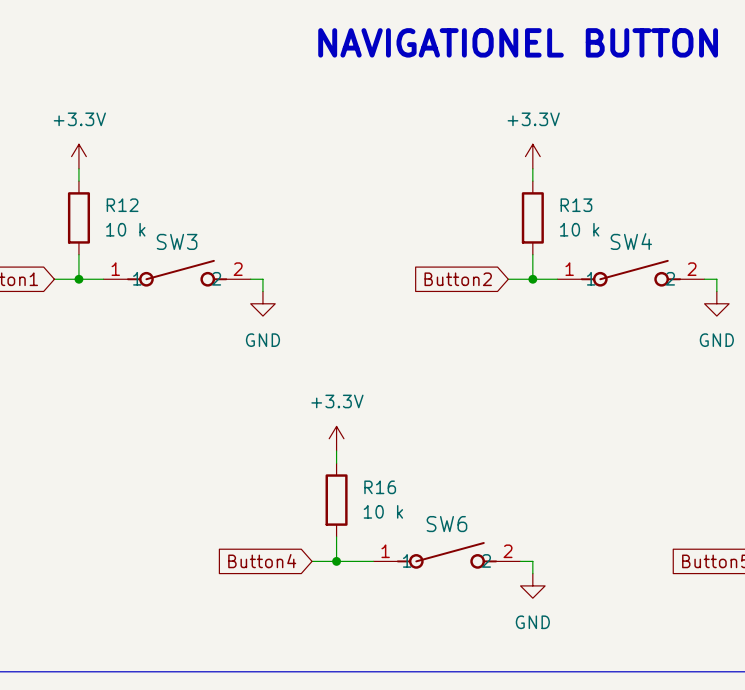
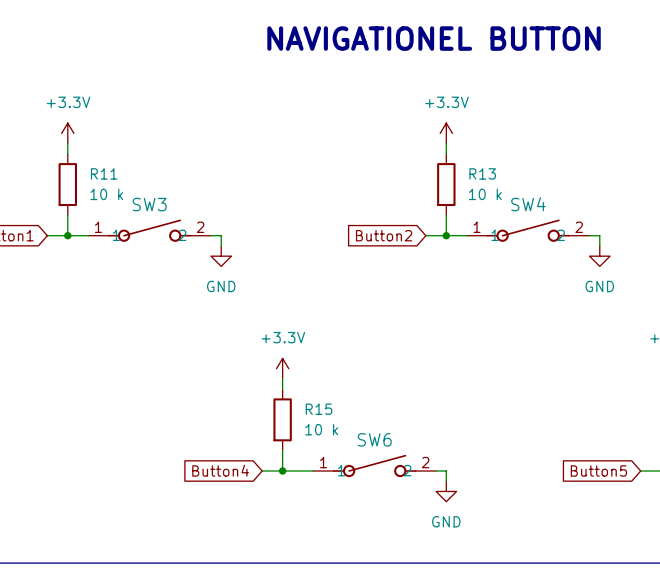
R12 name: R12 (122, 205) -> R11 (104, 173)
R16 name: R16 (380, 487) -> R15 (319, 409)

